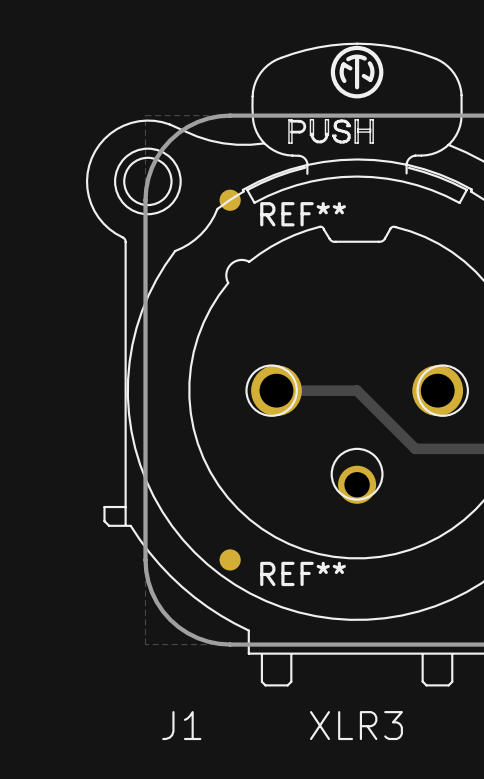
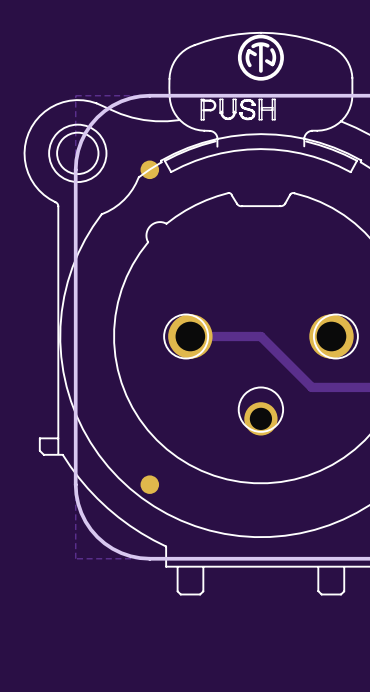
REF** name: REF** (303, 214) -> none
REF** name: REF** (303, 573) -> none
J1 name: J1 (181, 725) -> none
J1 value: XLR3 (356, 725) -> none

